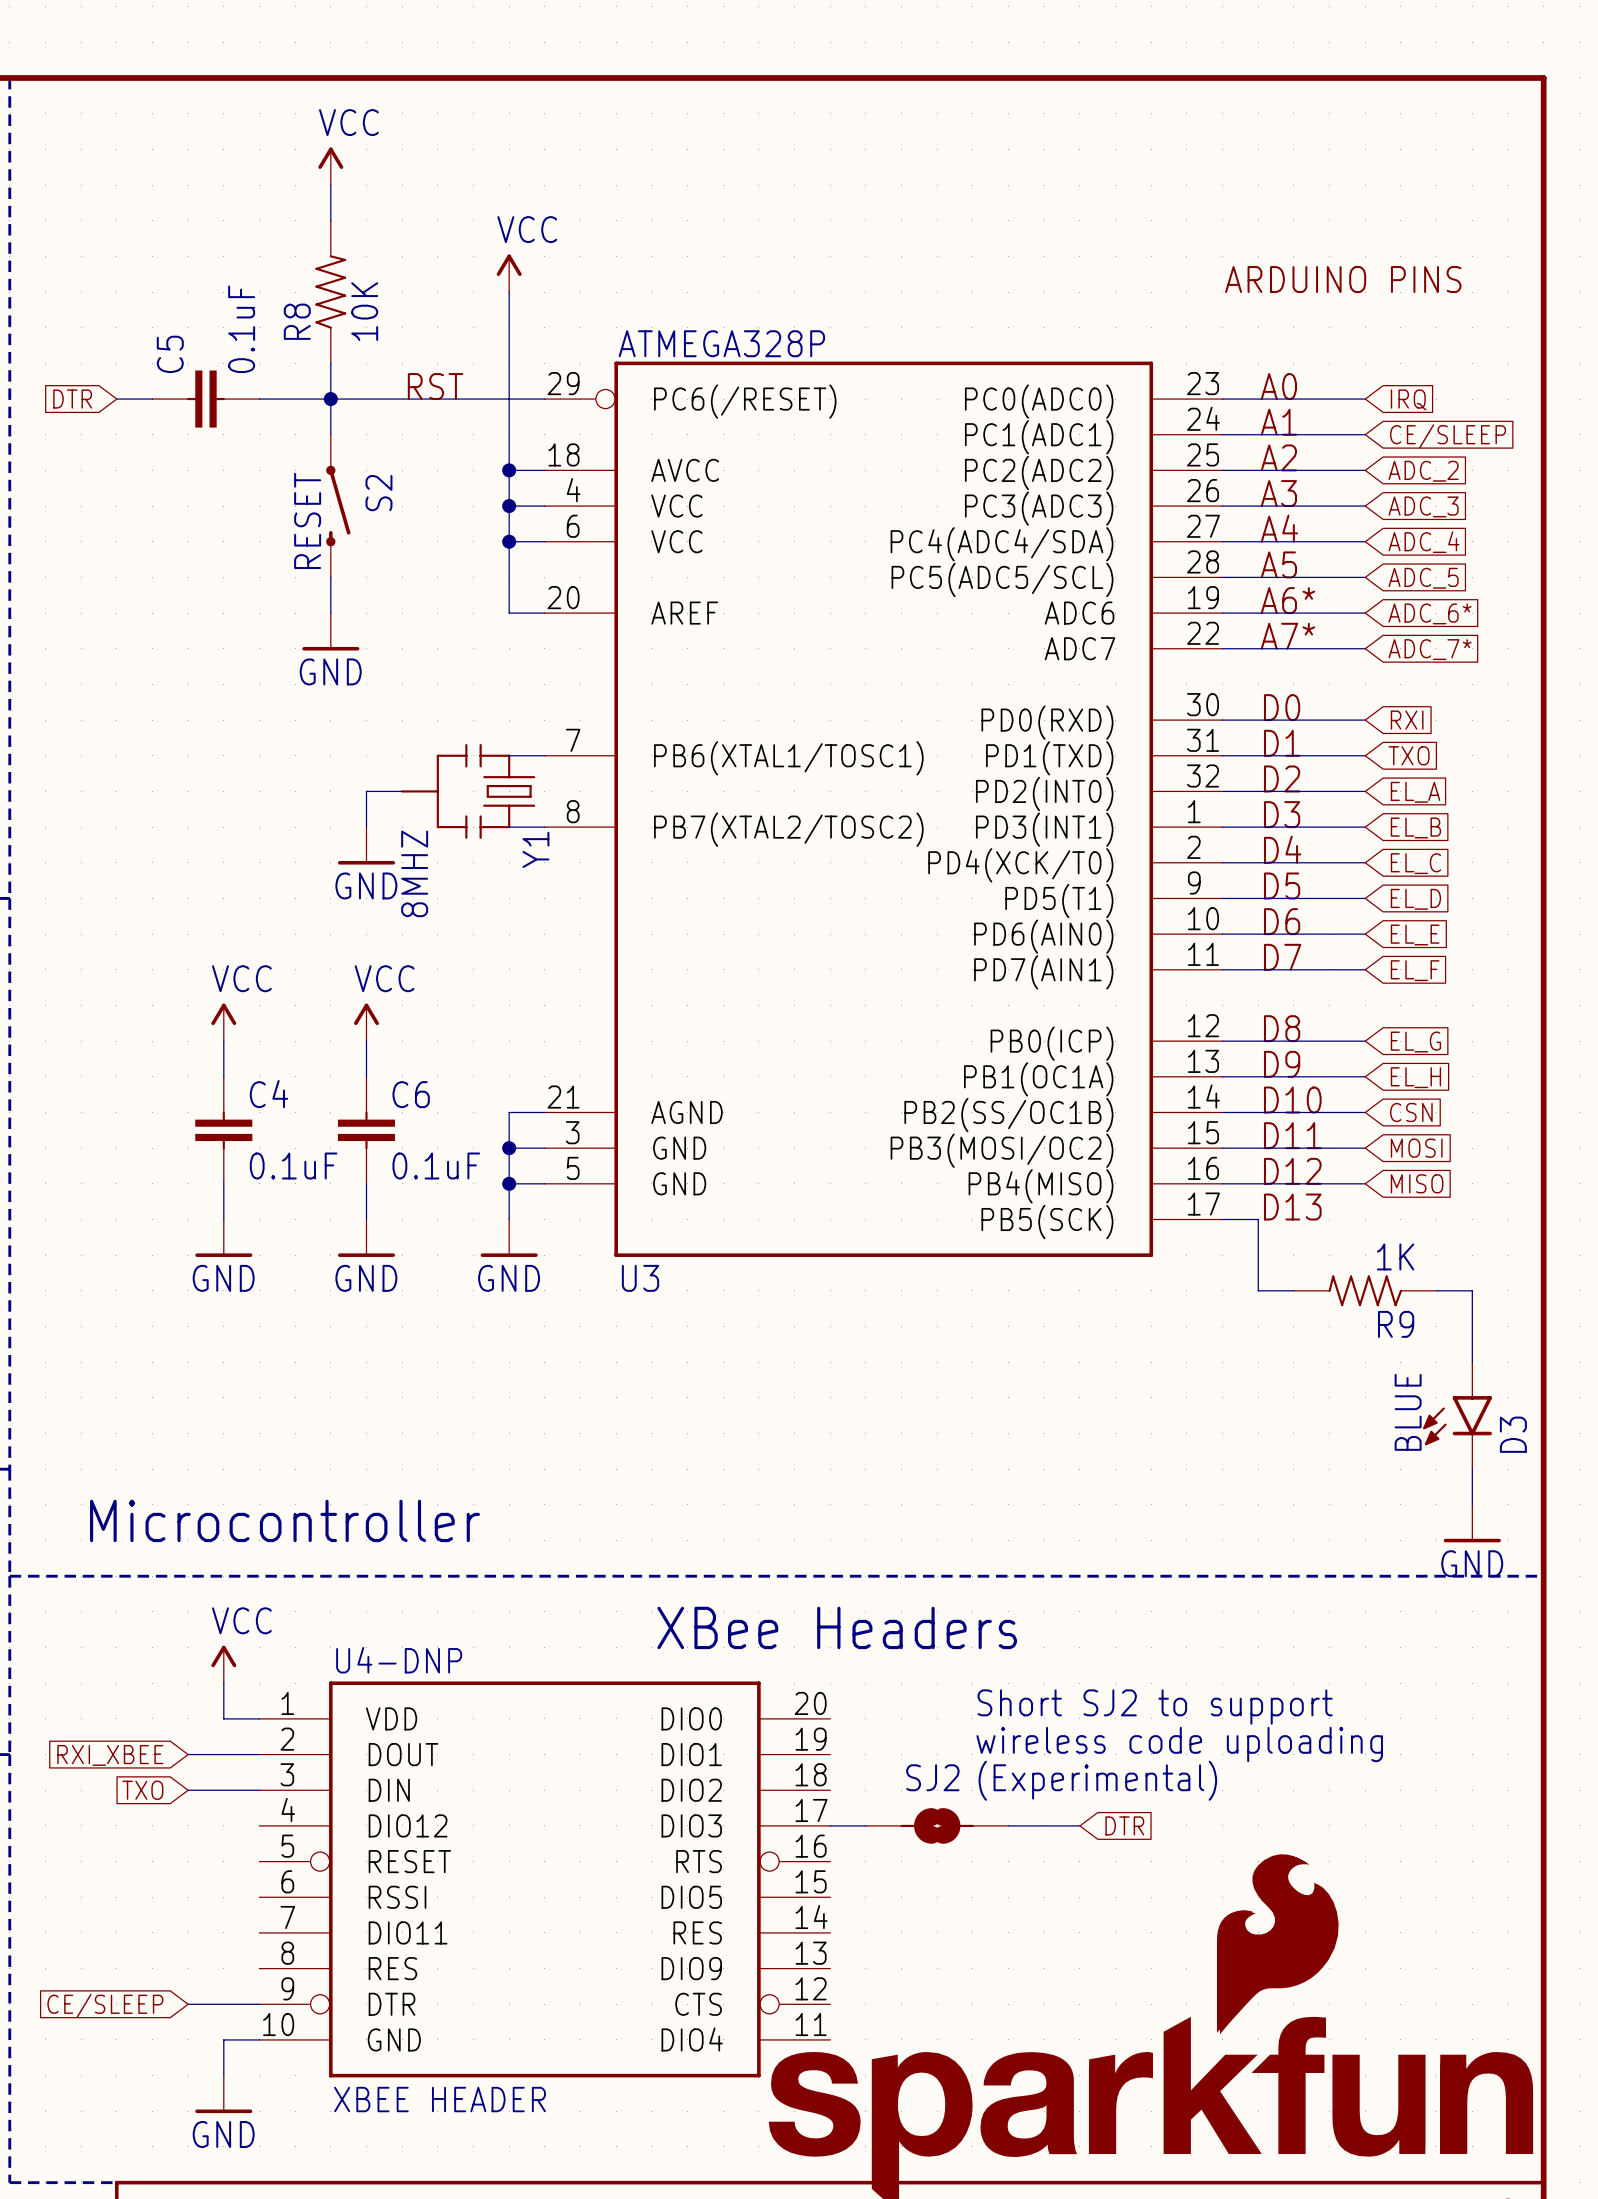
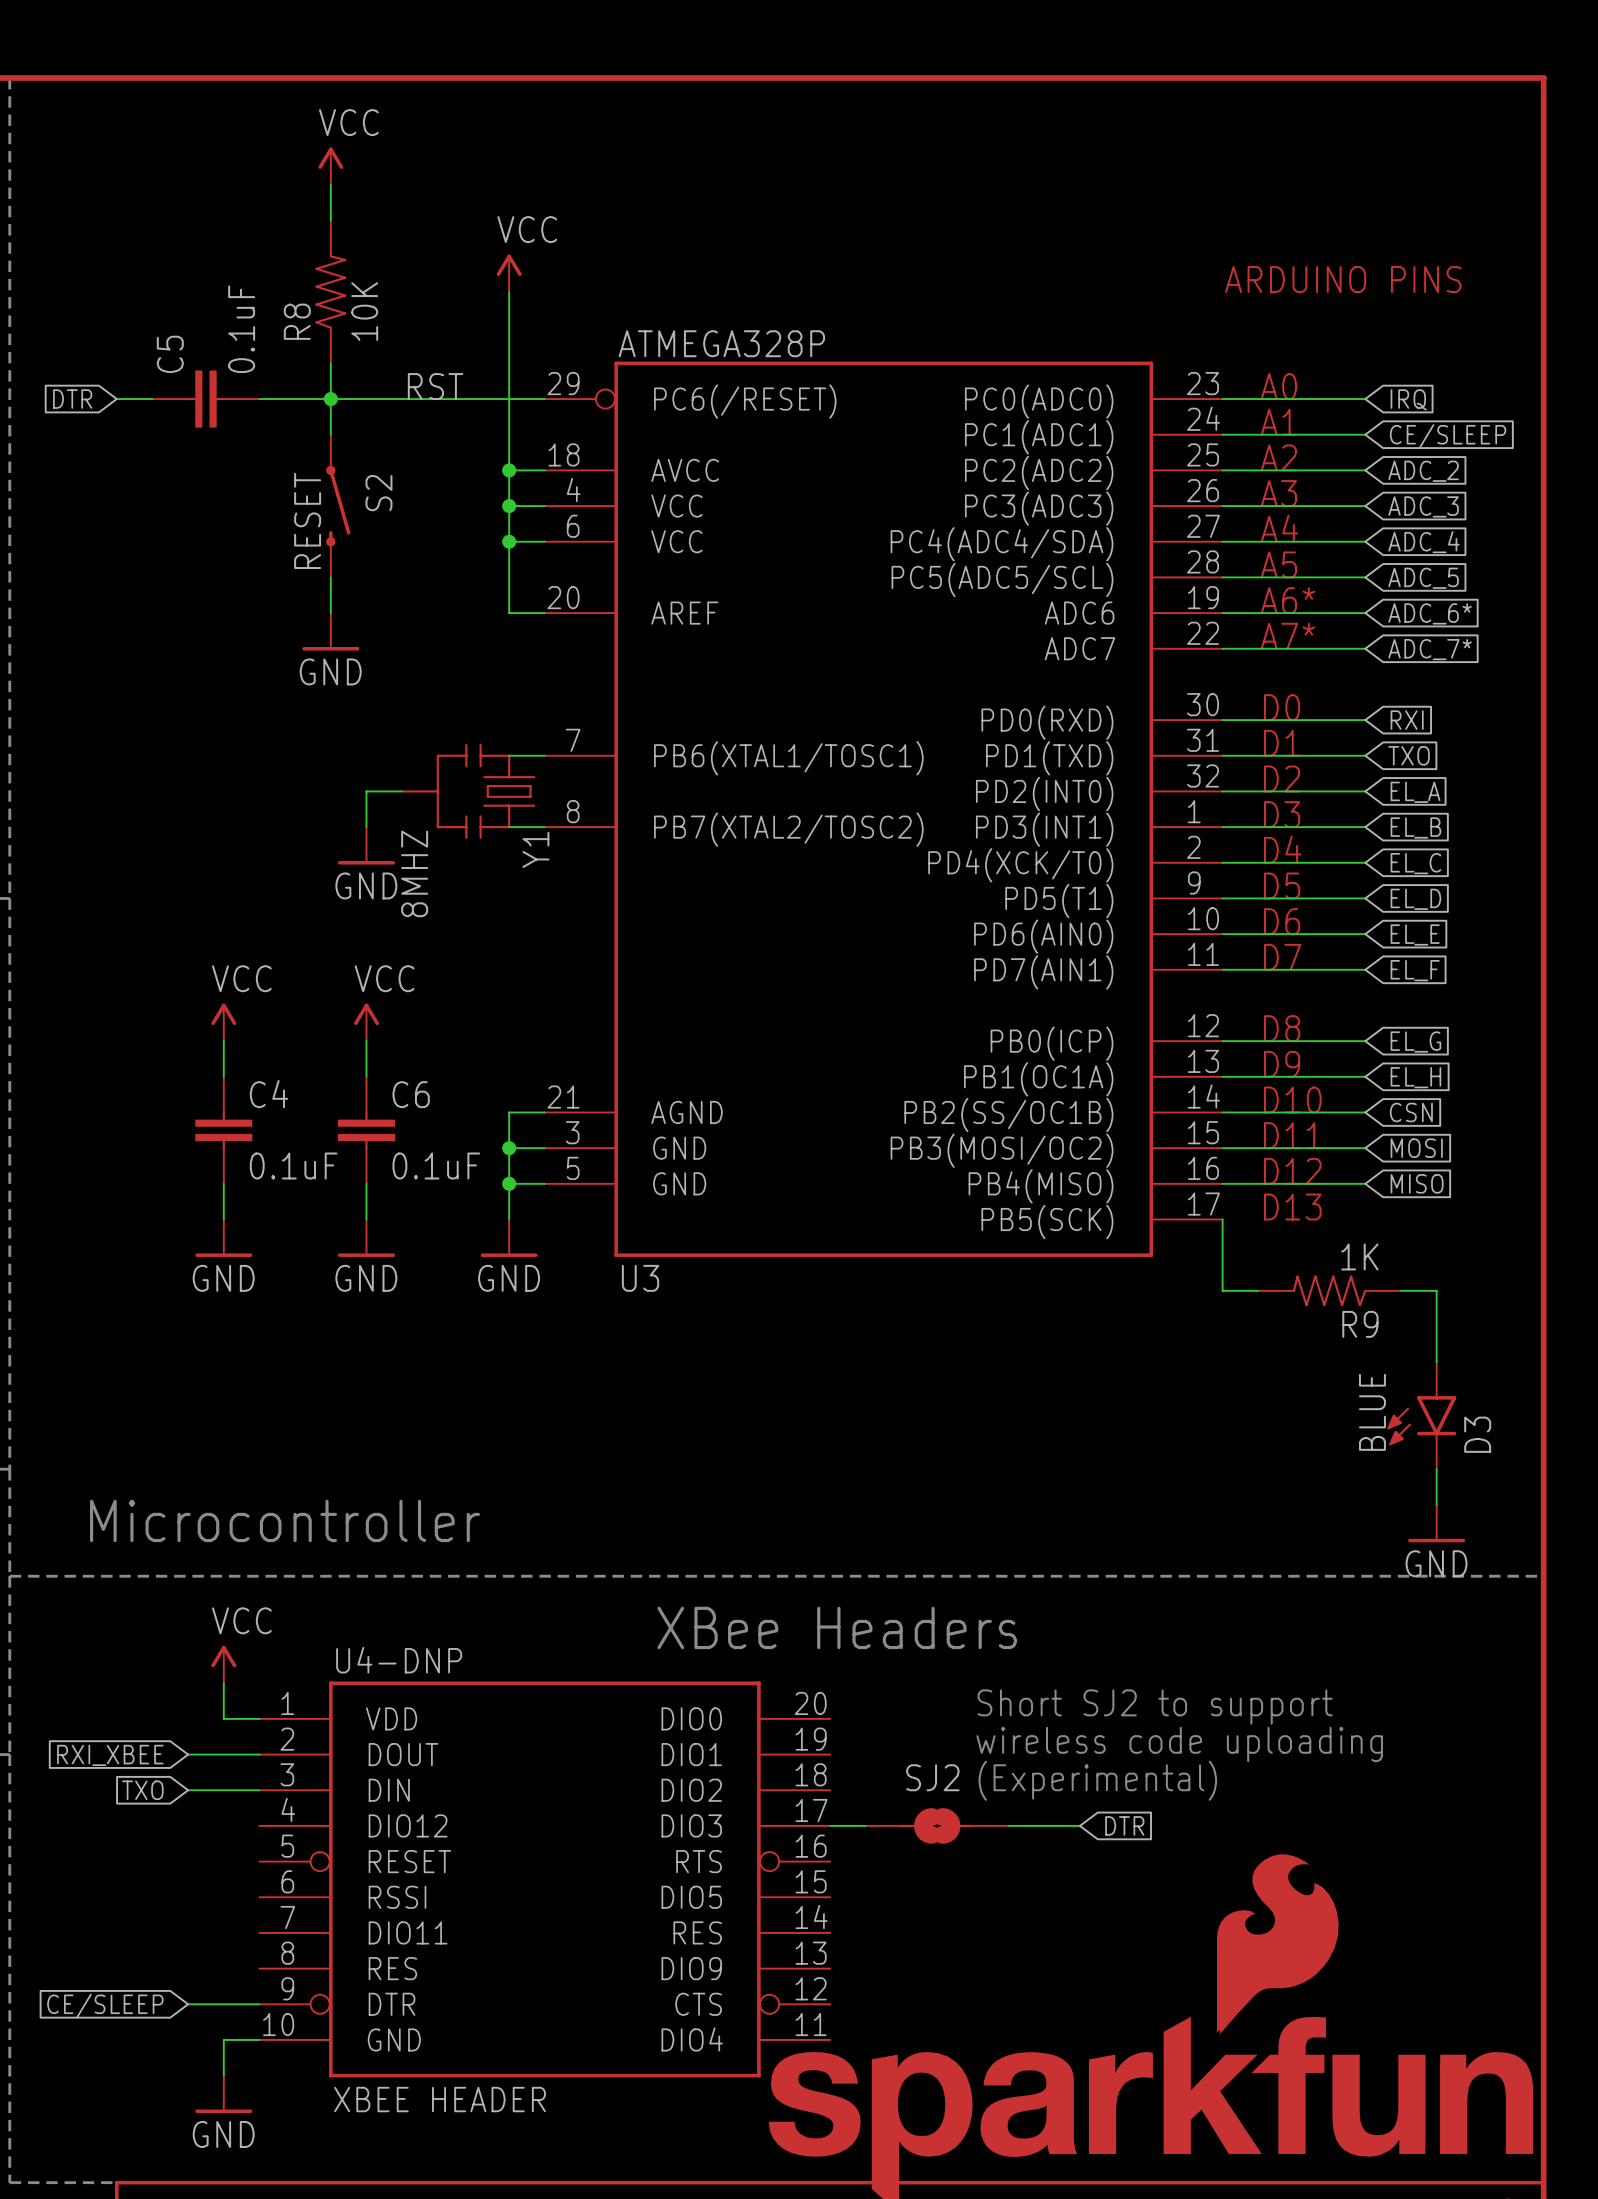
wire: (1222, 1219) (1258, 1219) (1258, 1290) (1293, 1290) -> (1222, 1219) (1222, 1290) (1258, 1290)
R9 position: (1365, 1290) -> (1329, 1290)
wire: (1436, 1290) (1472, 1290) (1472, 1362) -> (1400, 1290) (1436, 1290) (1436, 1362)
D3 position: (1457, 1415) -> (1421, 1415)
wire: (1472, 1469) (1472, 1504) -> (1436, 1469) (1436, 1504)
power symbol position: GND (1472, 1523) -> GND (1436, 1523)

